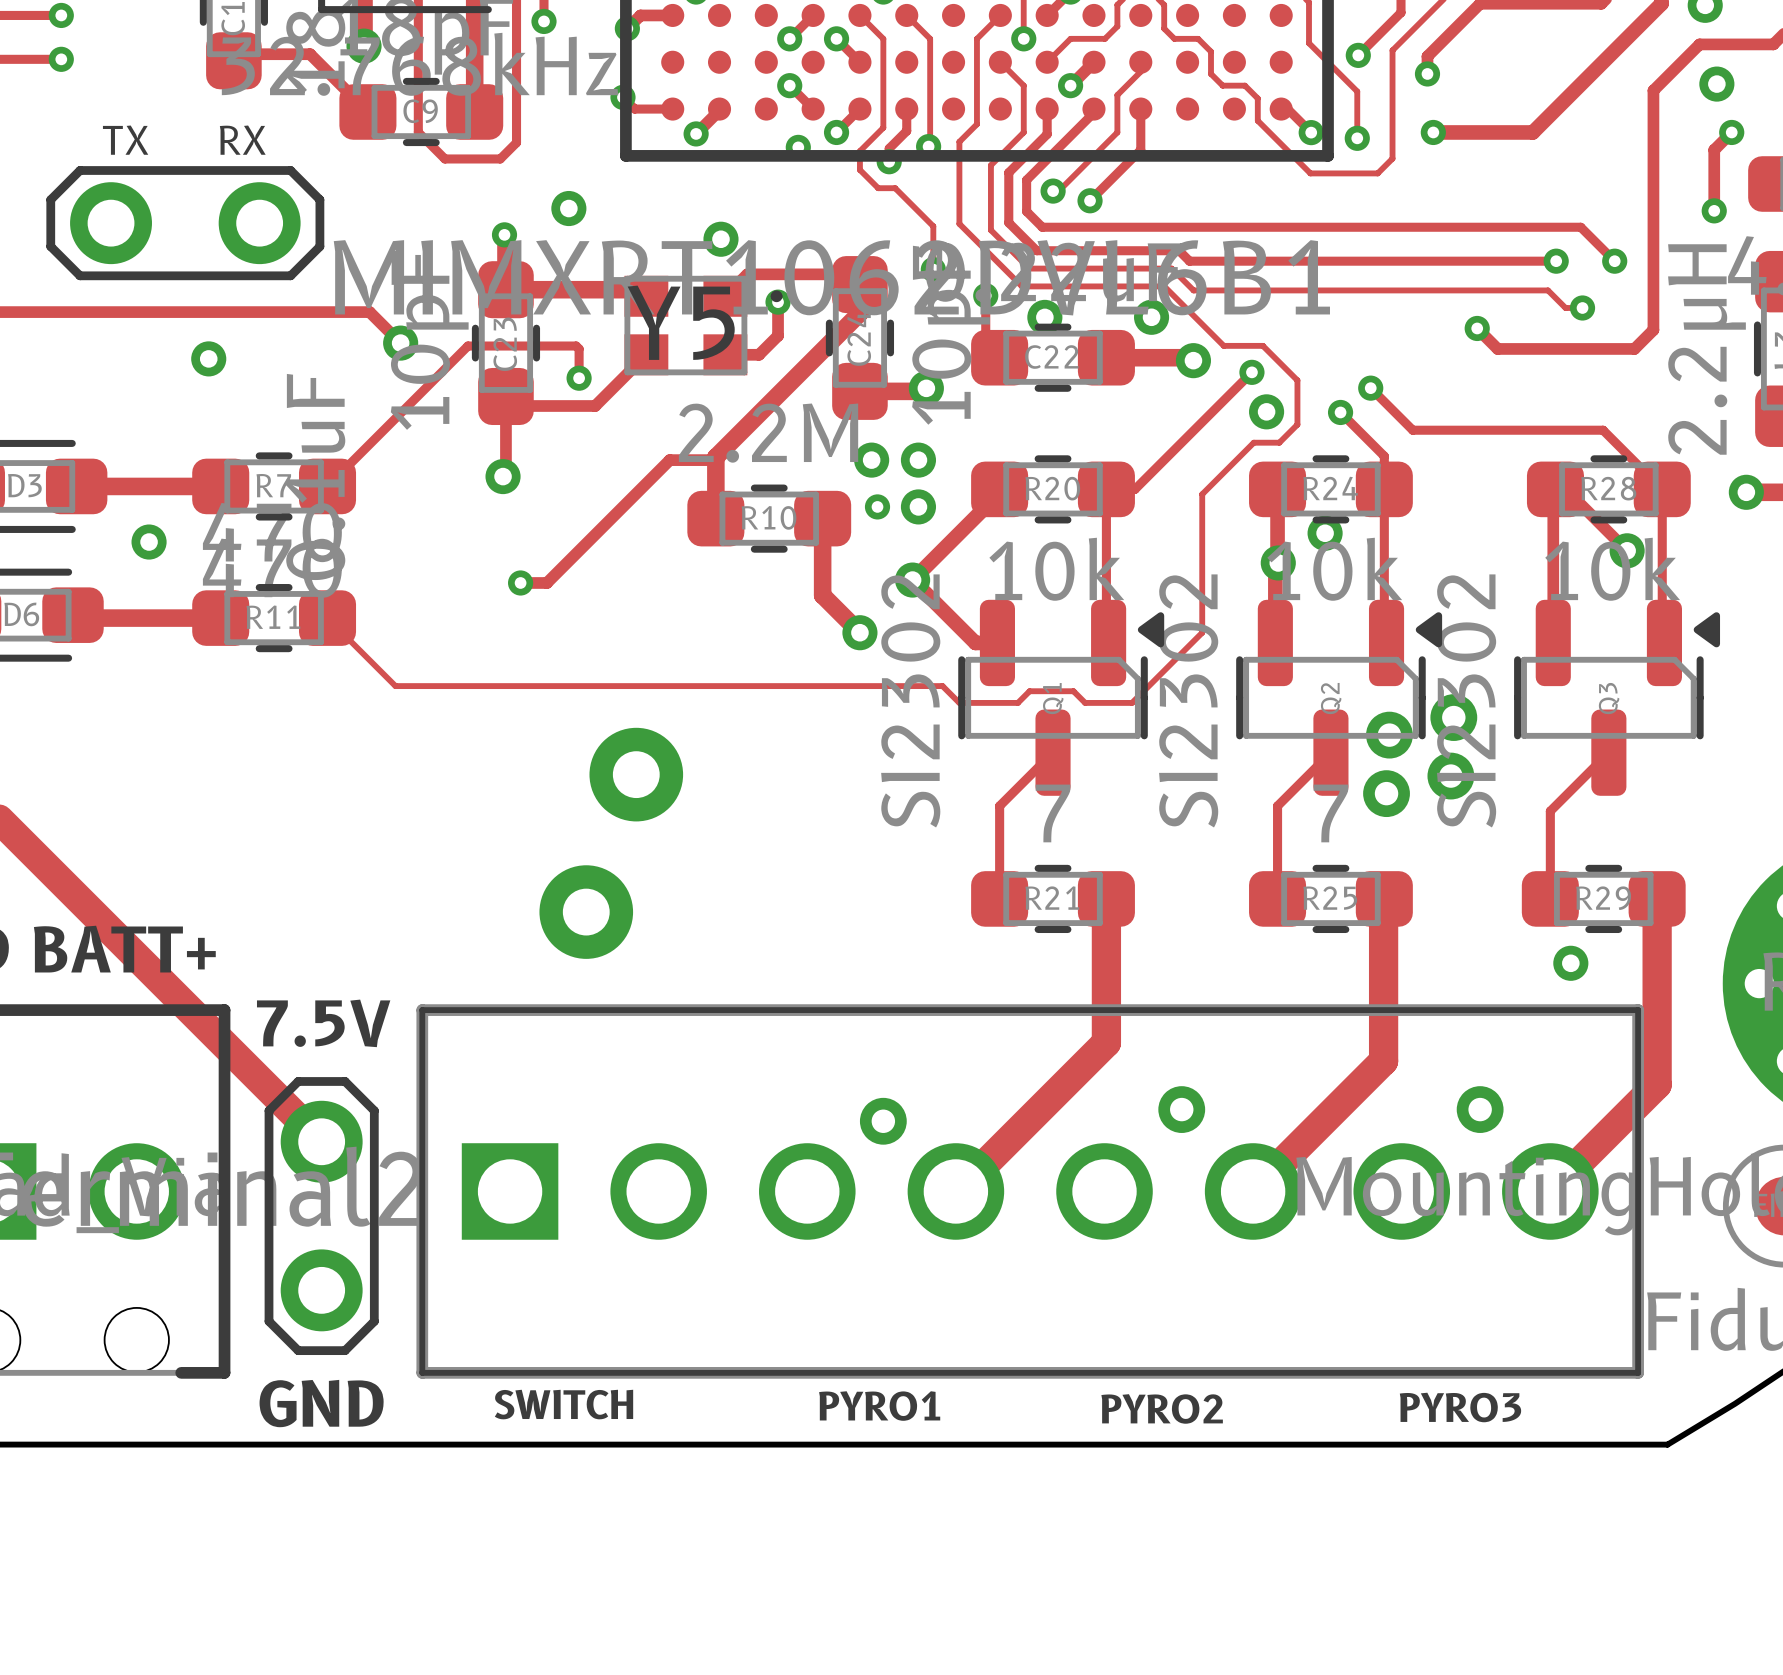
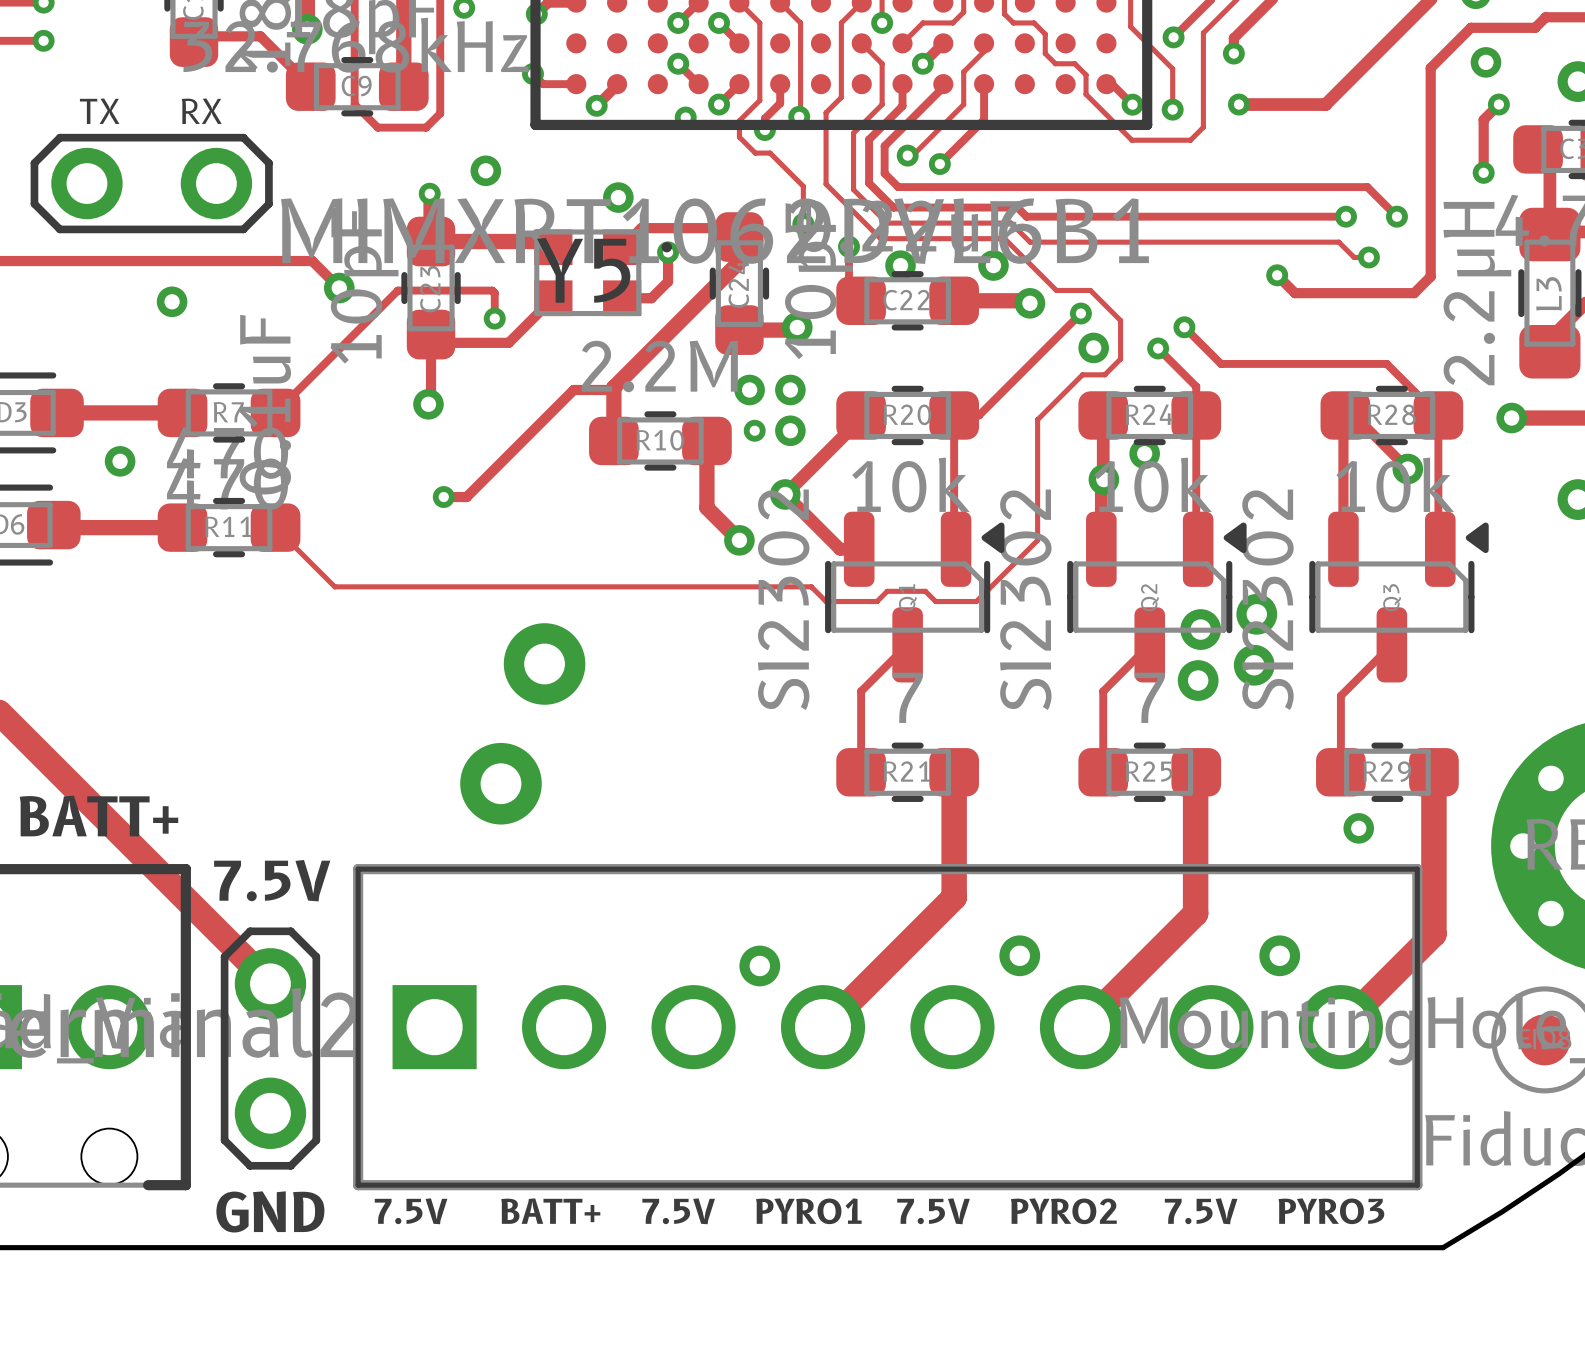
text: none -> 7.5V (411, 1211)
text: none -> BATT+ (550, 1211)
text: none -> 7.5V (678, 1211)
text: none -> 7.5V (933, 1211)
text: none -> 7.5V (1201, 1211)
text: SWITCH (564, 1404) -> none
text position: PYRO1 (879, 1406) -> PYRO1 (808, 1211)
text position: PYRO3 (1460, 1407) -> PYRO3 (1331, 1211)
text position: PYRO2 (1162, 1408) -> PYRO2 (1063, 1211)

